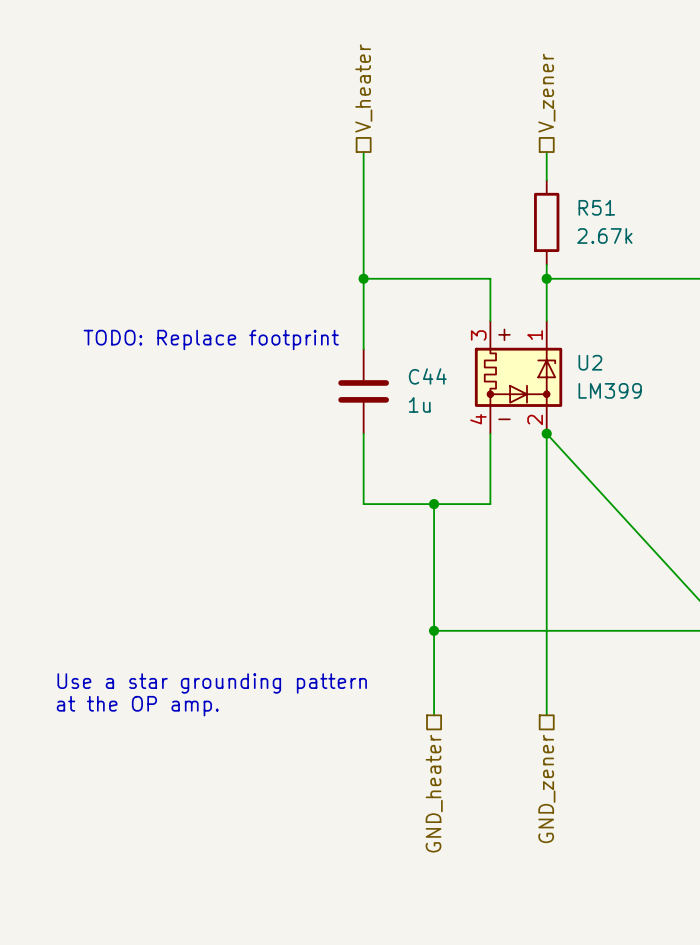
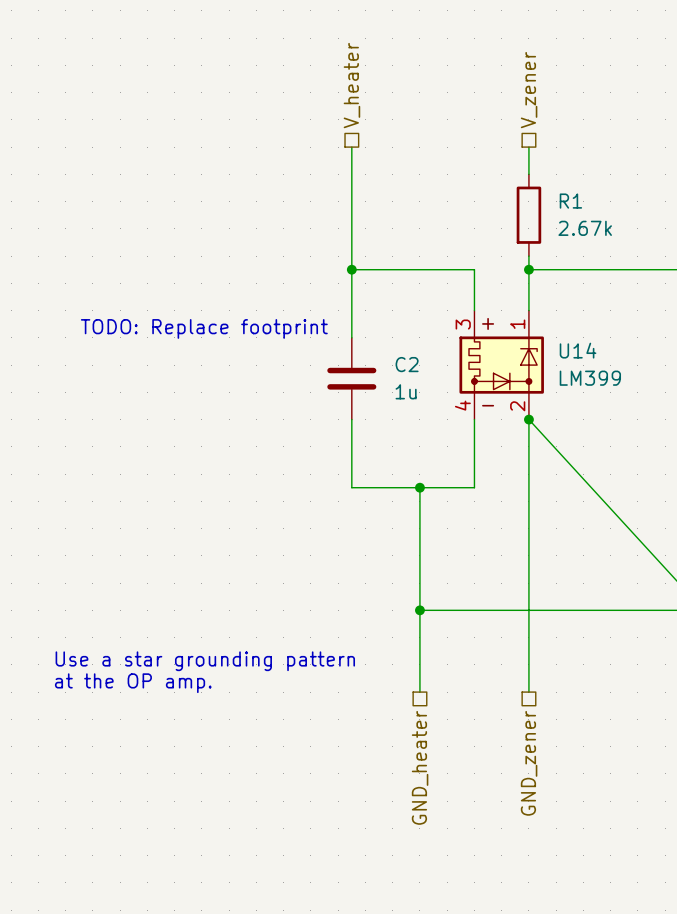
R51 name: R51 (596, 207) -> R1 (570, 201)
U2 name: U2 (590, 362) -> U14 (578, 350)
C44 name: C44 (427, 376) -> C2 (407, 364)

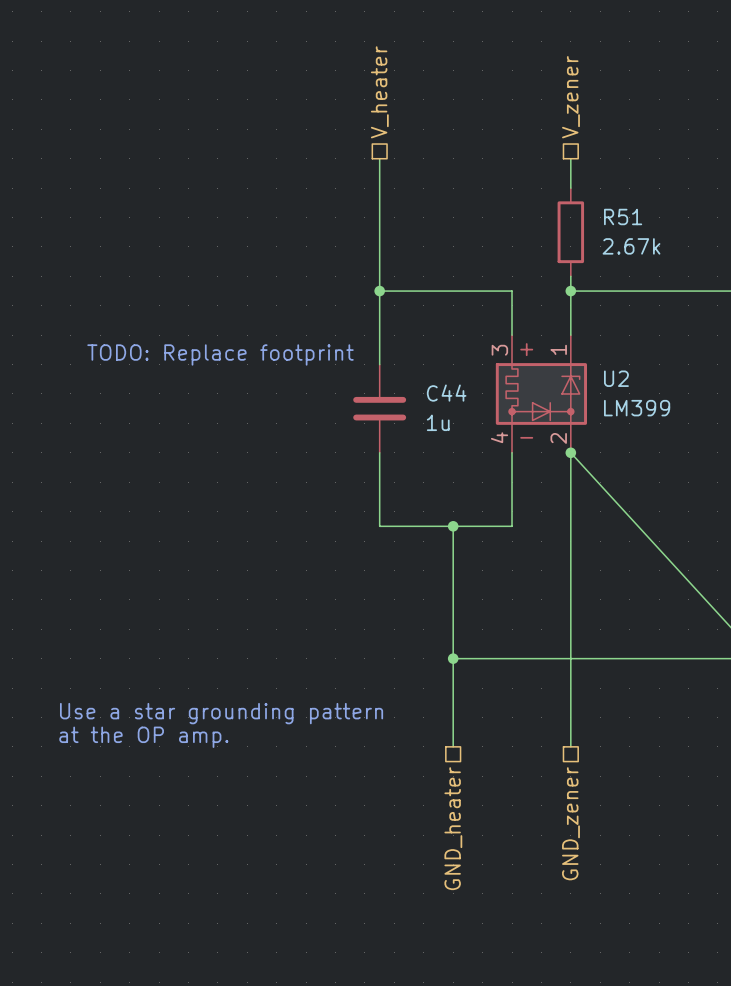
R1 name: R1 (570, 201) -> R51 (623, 216)
U14 name: U14 (578, 350) -> U2 (616, 378)
C2 name: C2 (407, 364) -> C44 (446, 393)

